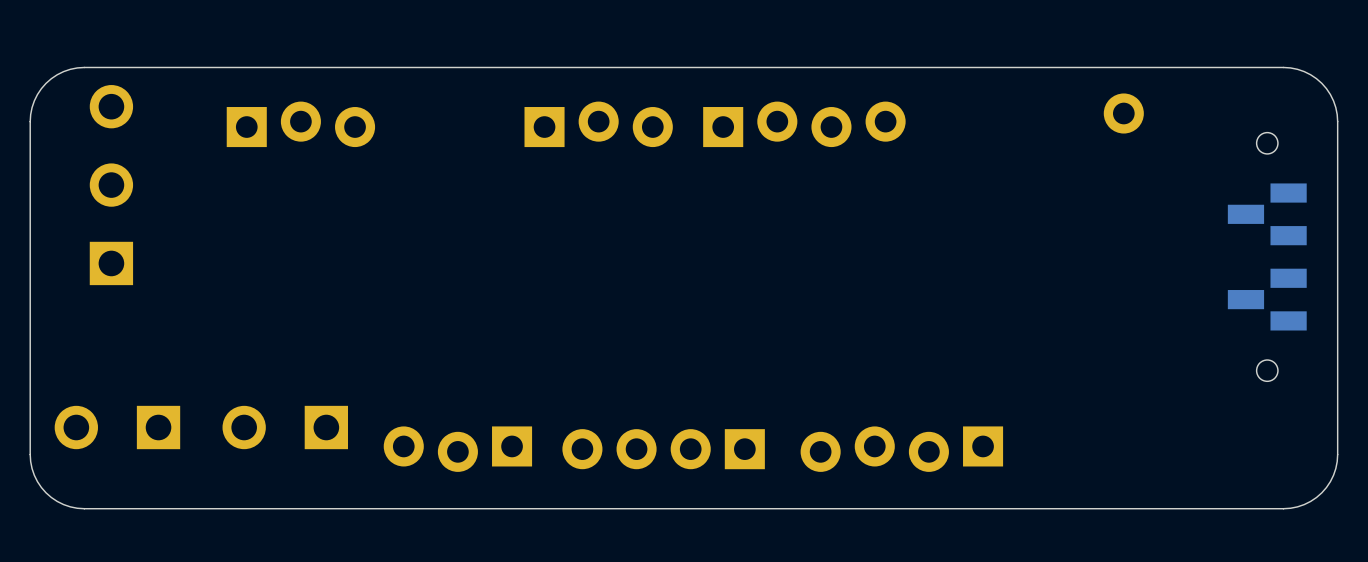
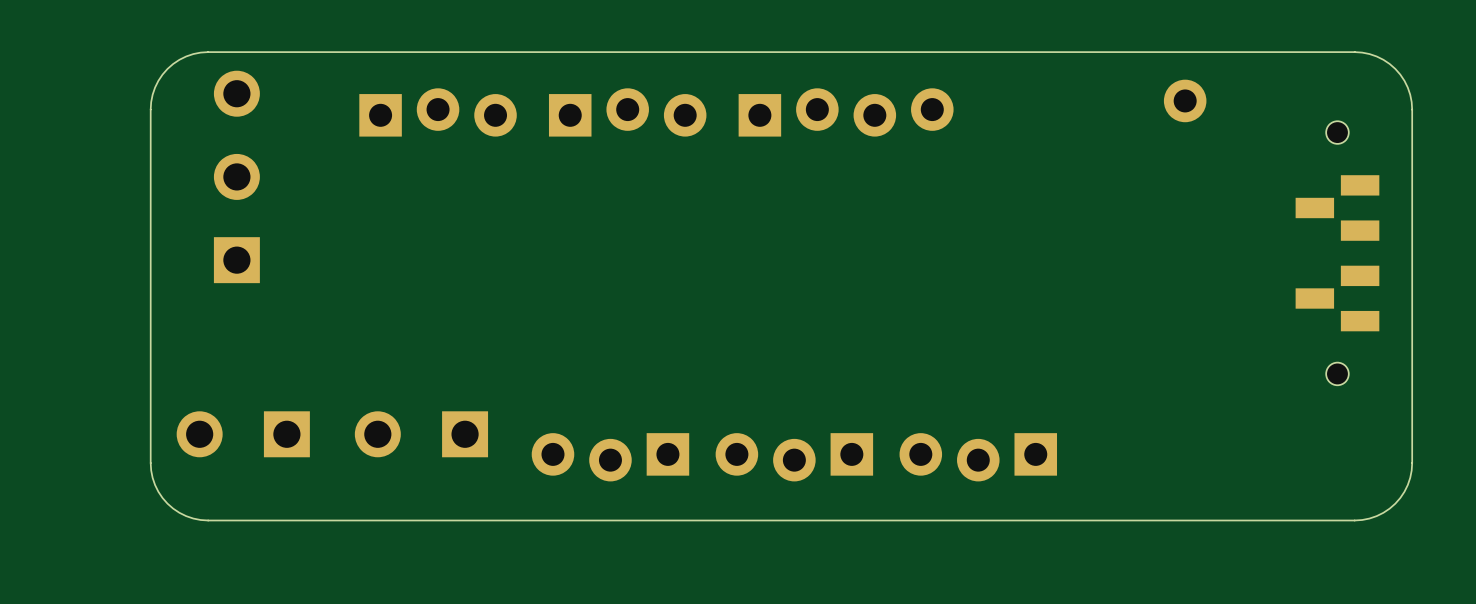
board edge: (203, 67) (84, 67) (70, 69) (51, 78) (41, 88) (32, 107) (30, 121) (30, 454) (34, 475) (41, 487) (51, 497) (63, 504) (77, 508) (203, 508) -> (208, 52) (186, 56) (167, 68) (155, 87) (150, 109) (151, 470) (155, 485) (167, 503) (186, 516) (208, 520)
part position: (300, 124) -> (438, 112)
part position: (111, 185) -> (236, 176)
part: (117, 427) -> none
part position: (285, 427) -> (243, 434)
part: none -> (421, 434)
part position: (457, 449) -> (610, 457)
part: (663, 449) -> none
part: none -> (794, 457)
part: (901, 449) -> none

